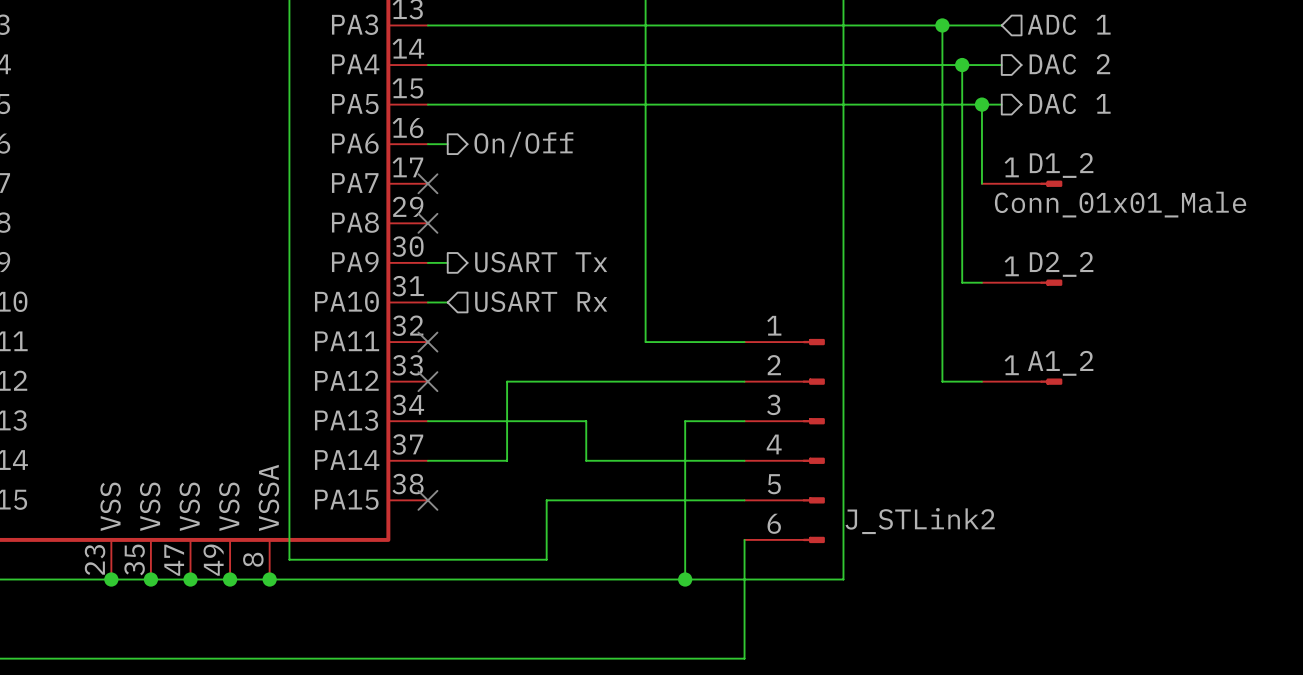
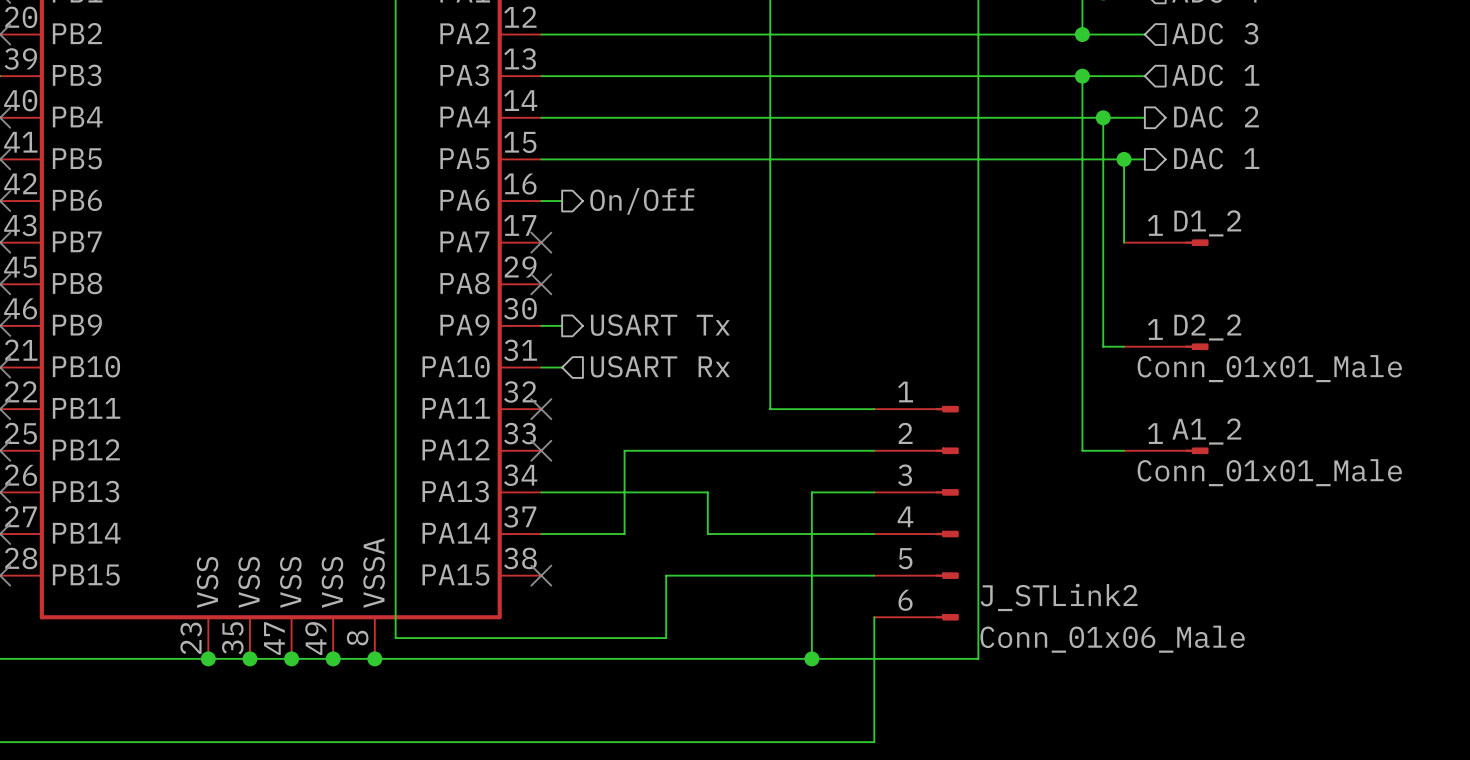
D1_2 value: Conn_01x01_Male (1120, 204) -> none
D2_2 value: none -> Conn_01x01_Male (1269, 368)
A1_2 value: none -> Conn_01x01_Male (1269, 472)
J_STLink2 value: none -> Conn_01x06_Male (1112, 639)

